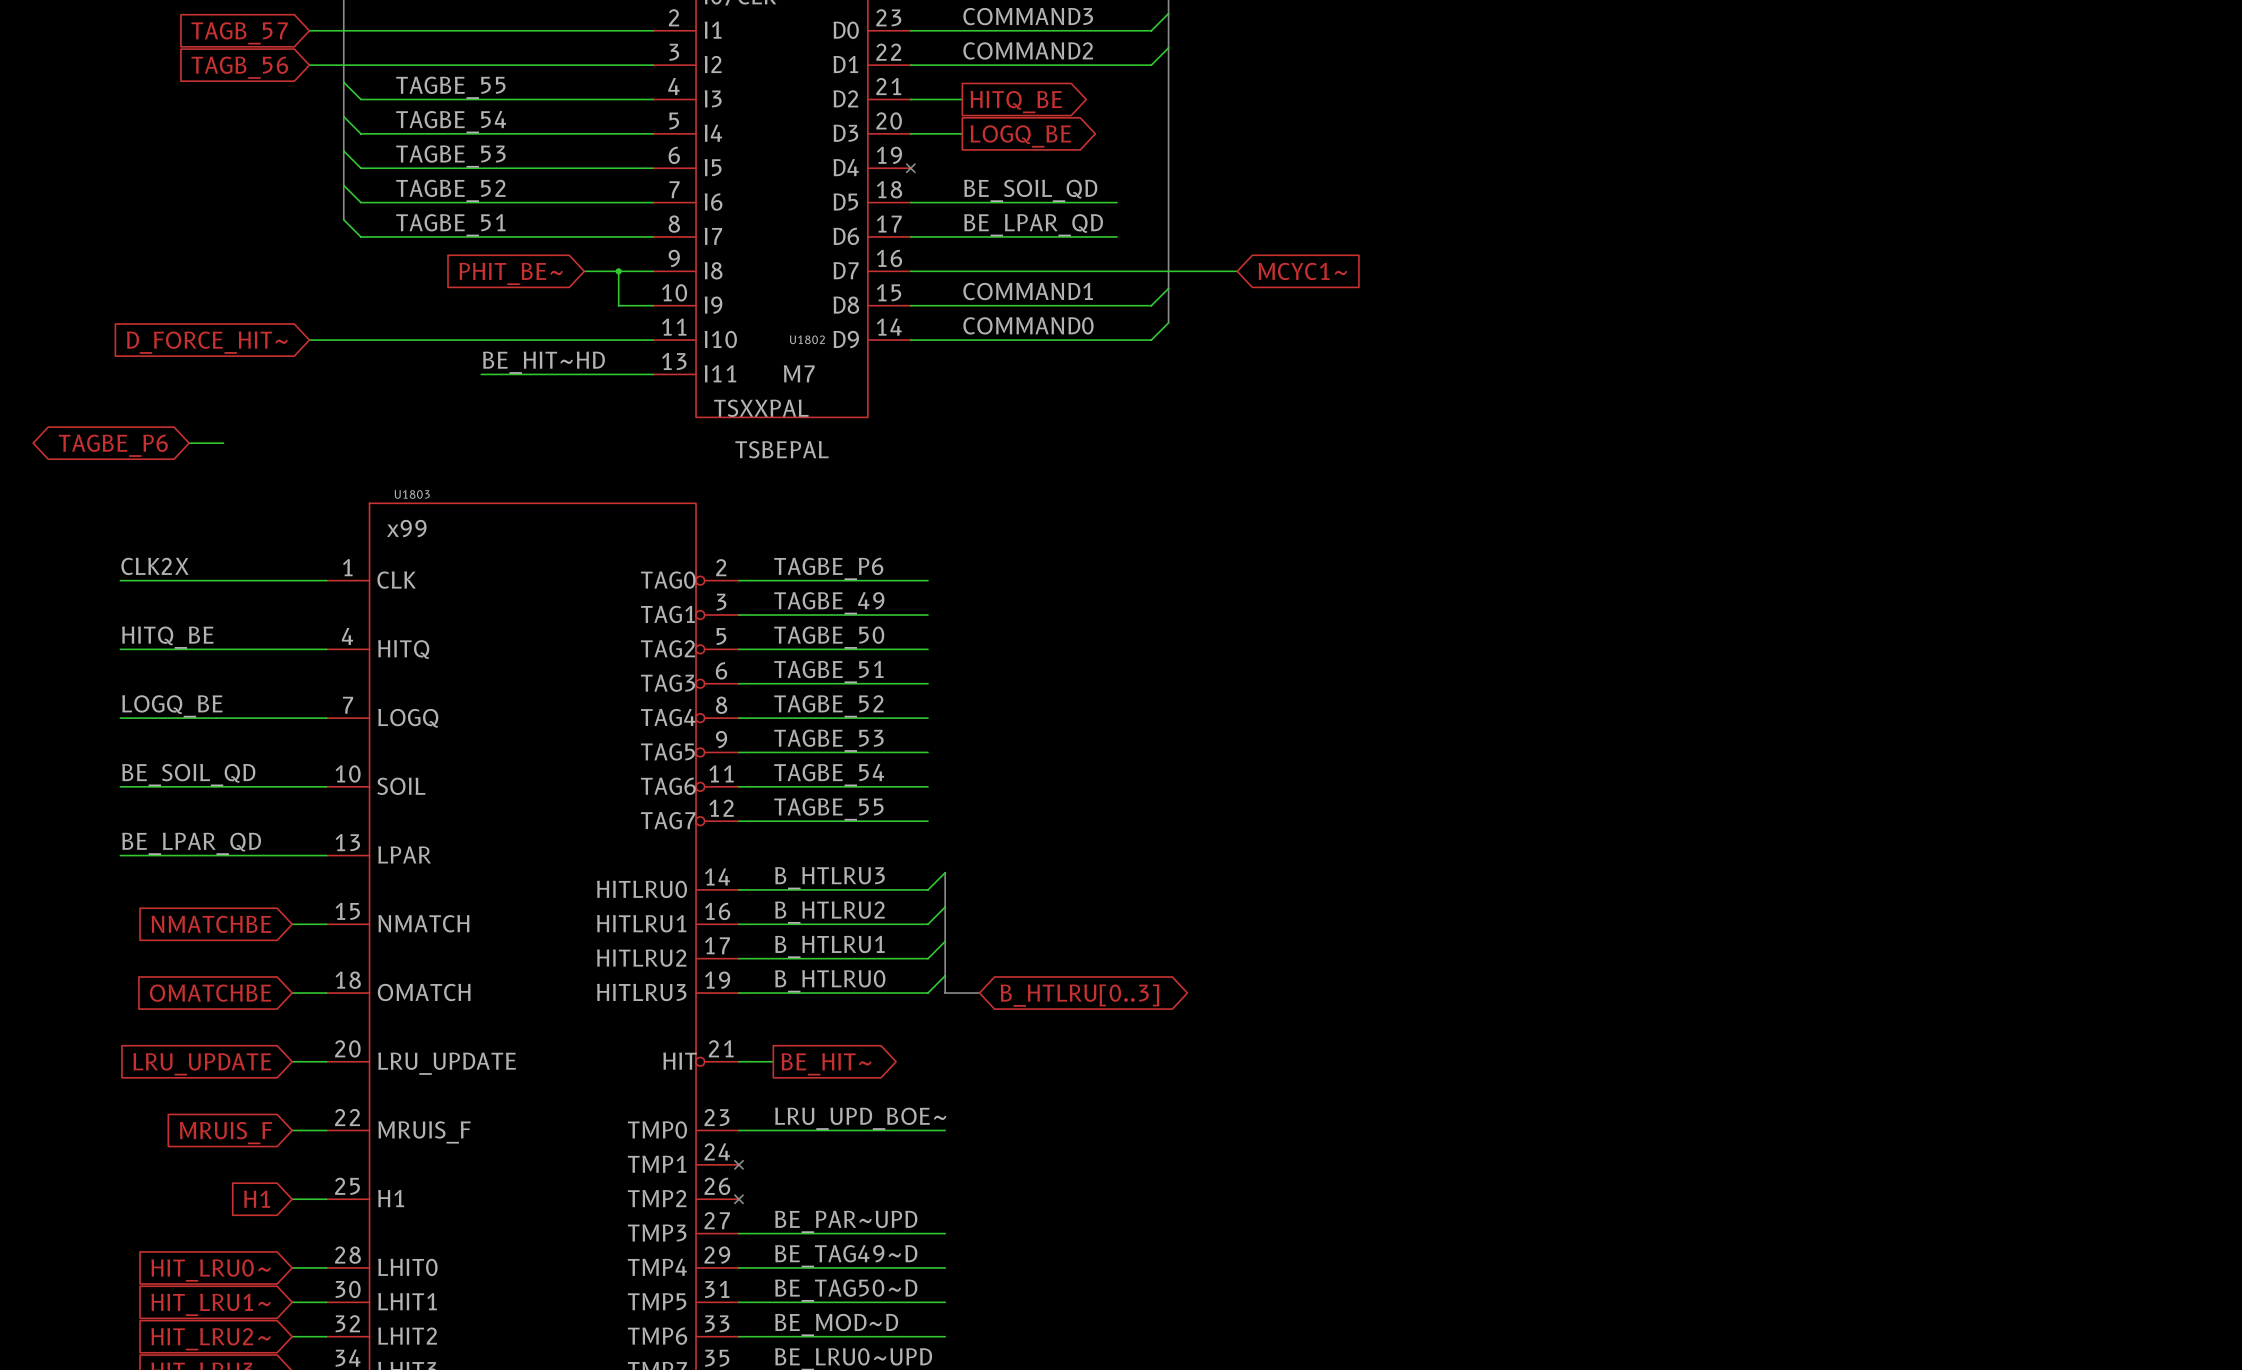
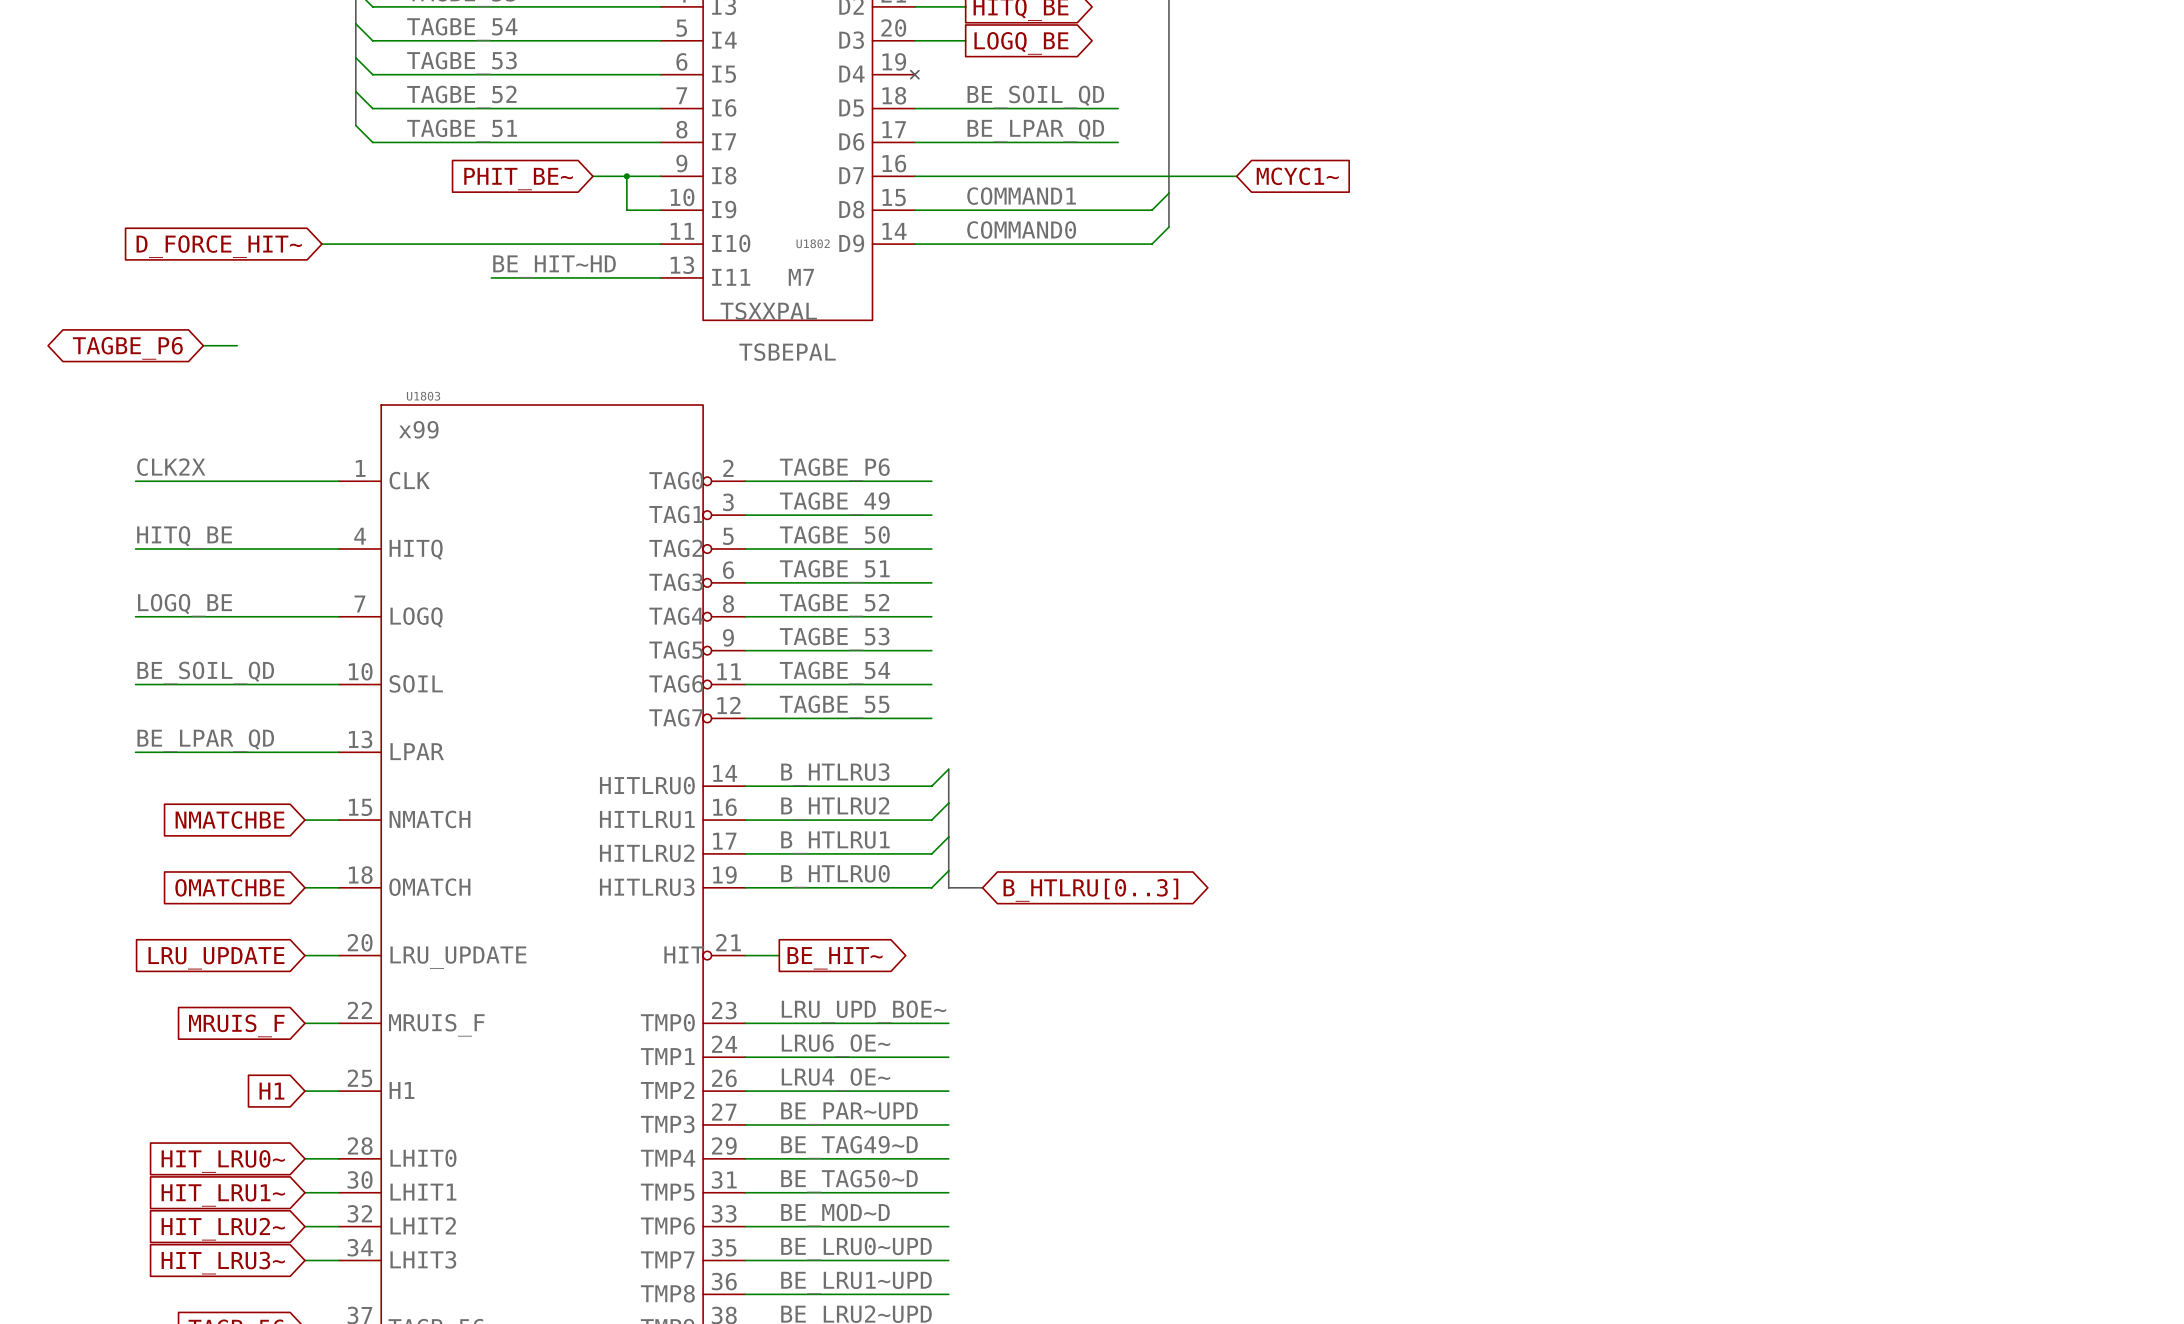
label: none -> LRU6_OE~ (836, 1045)
wire: none -> (745, 1057) (948, 1057)
no-connect mark: (738, 1164) -> none
label: none -> LRU4_OE~ (836, 1079)
wire: none -> (745, 1091) (948, 1091)
no-connect mark: (738, 1199) -> none

